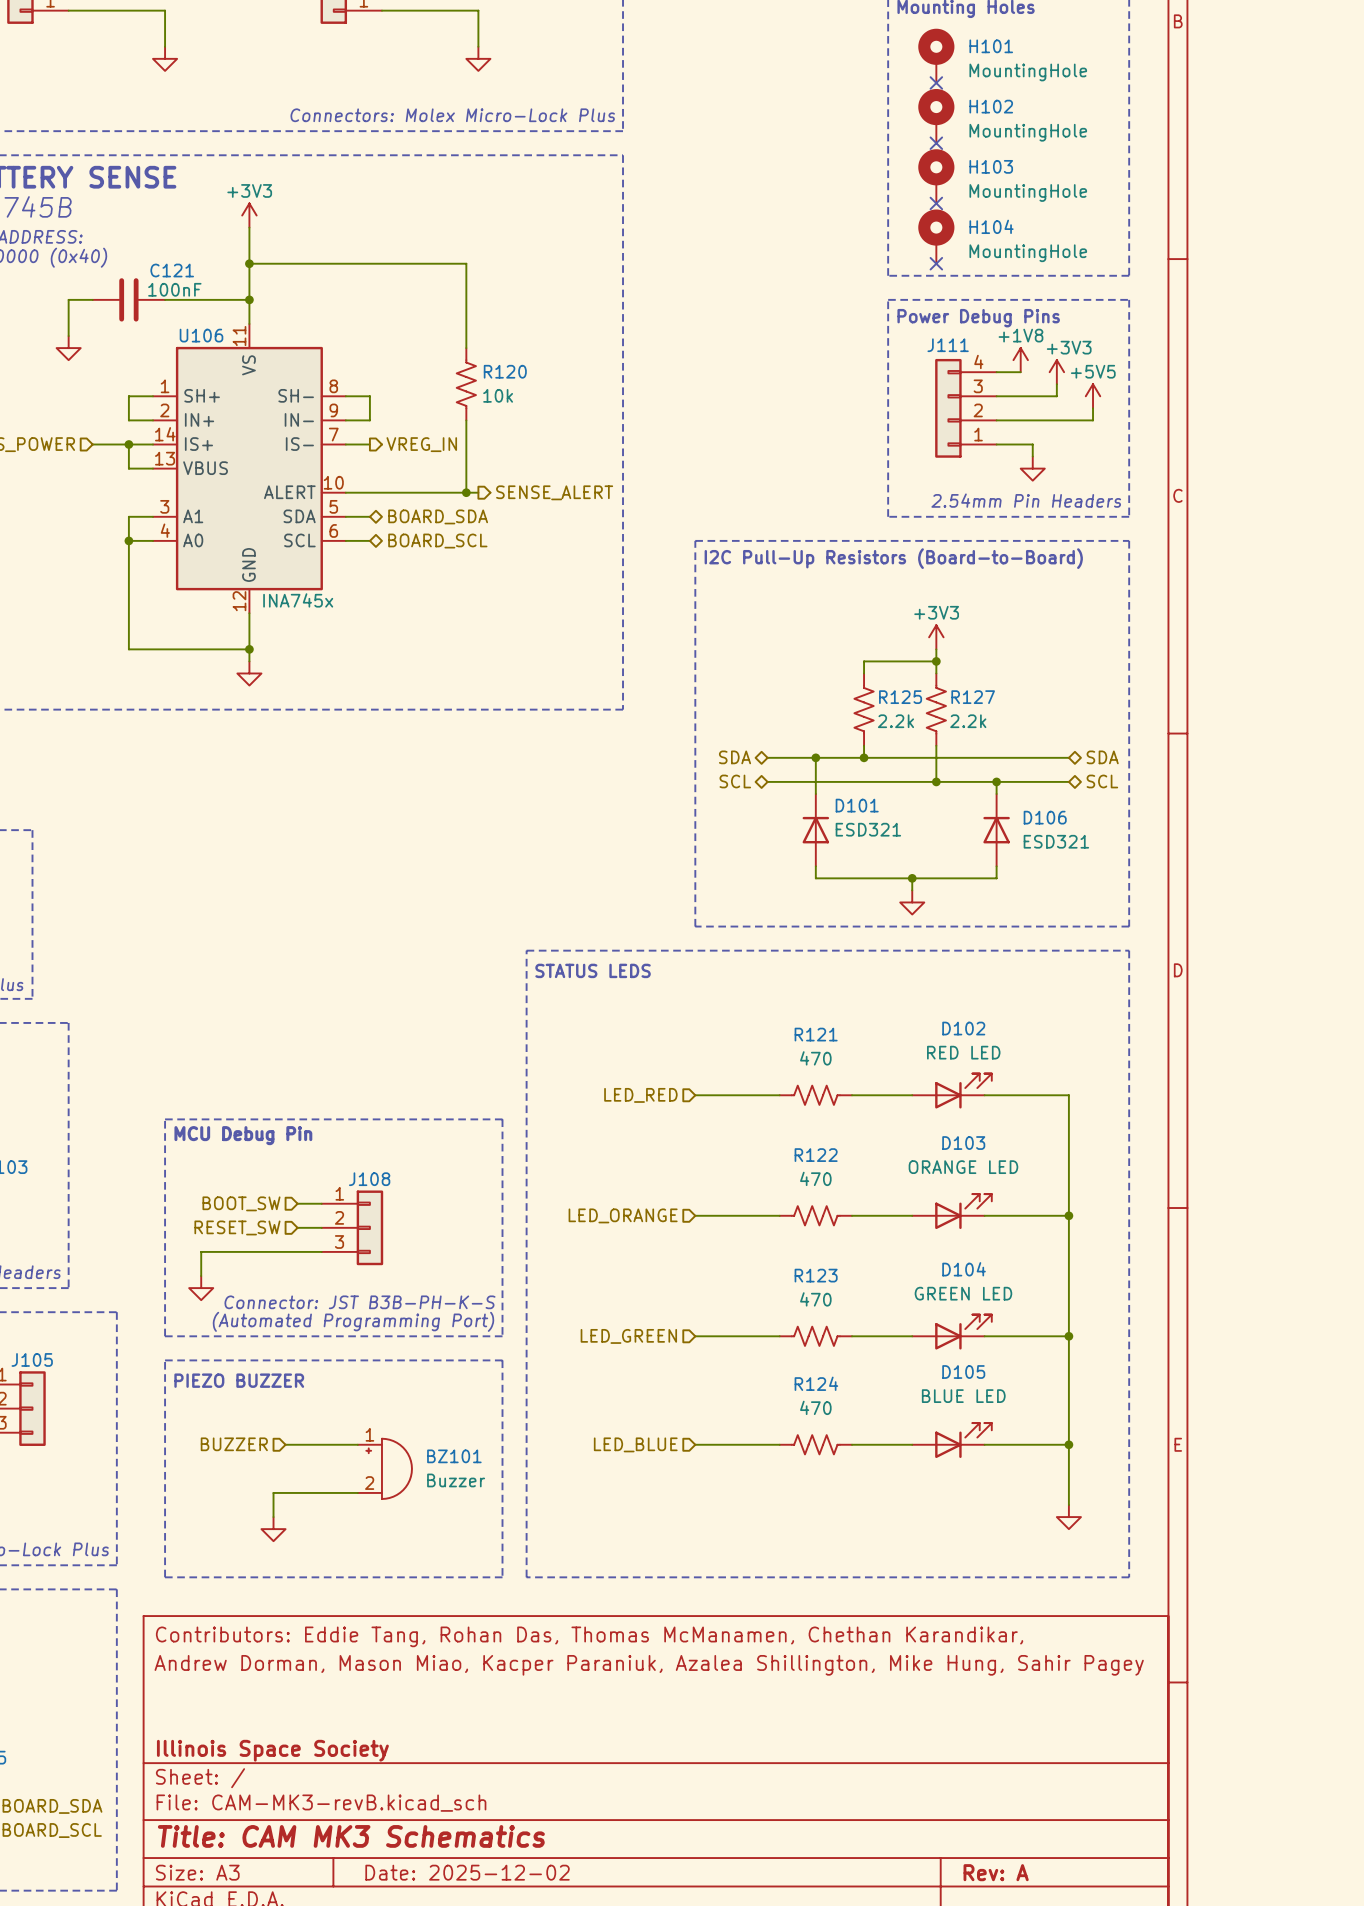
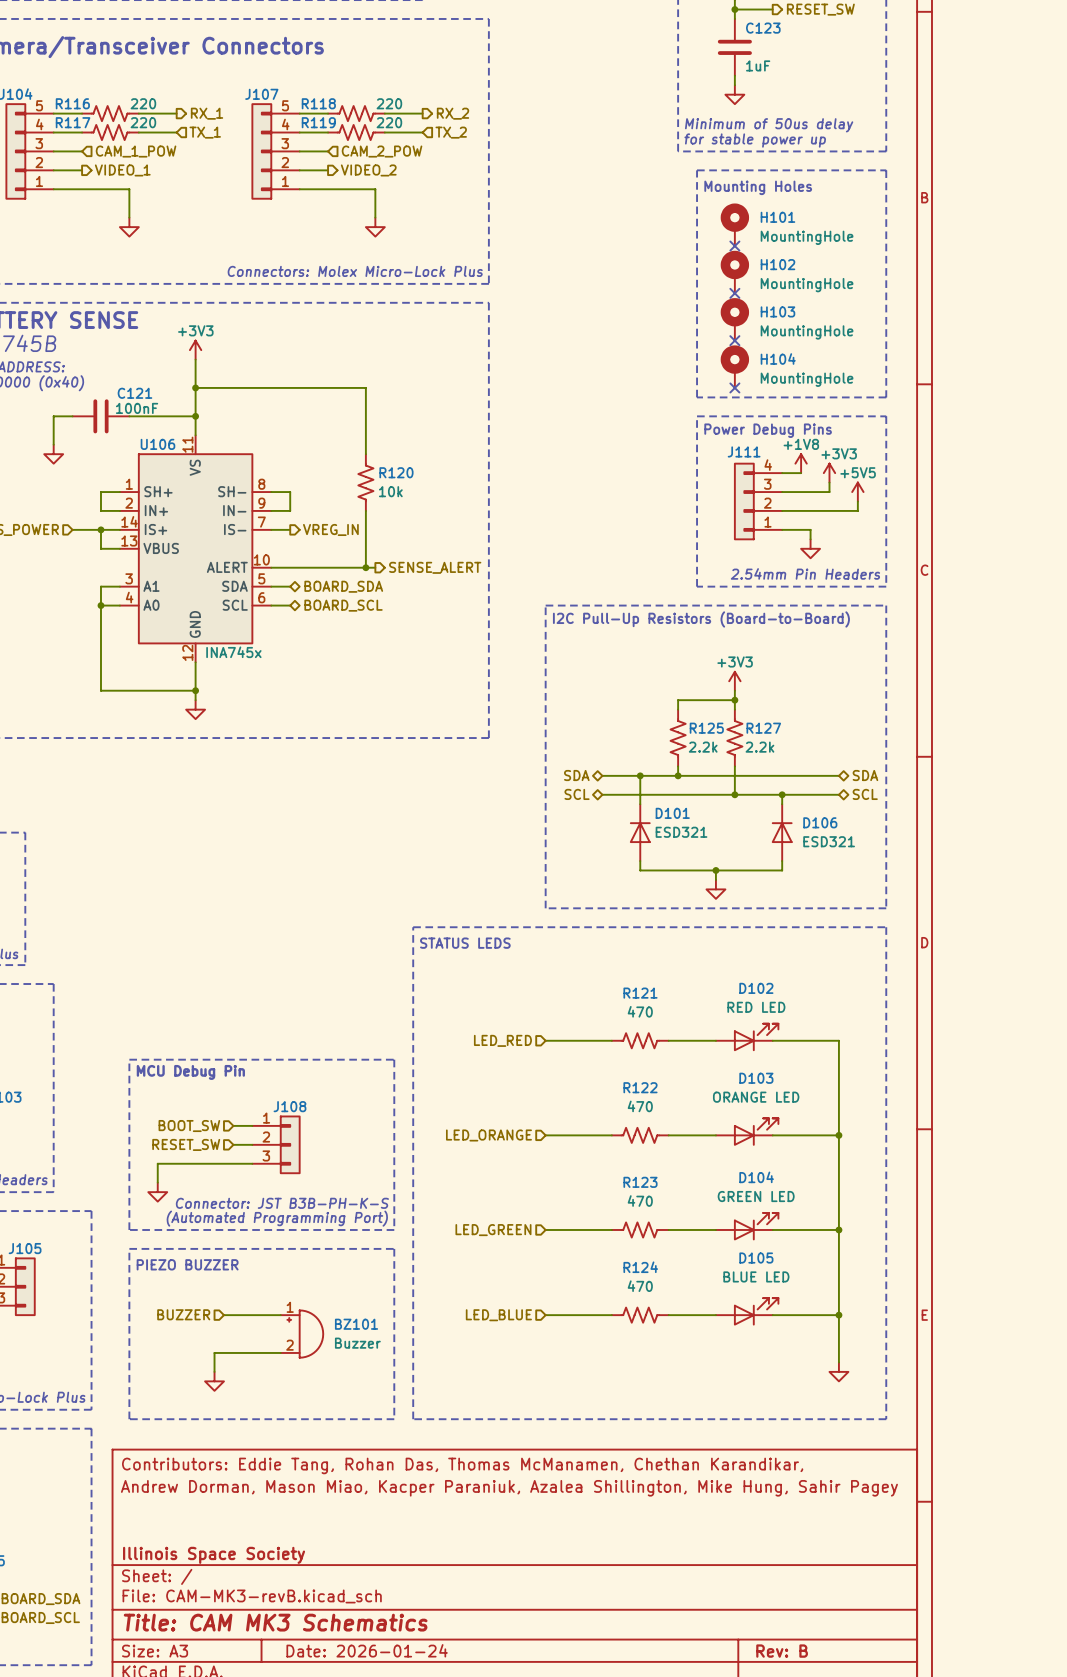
title block: Date: 2025-12-02 (467, 1872) -> Date: 2026-01-24 (367, 1650)
title block: Rev: A (996, 1872) -> Rev: B (782, 1651)

